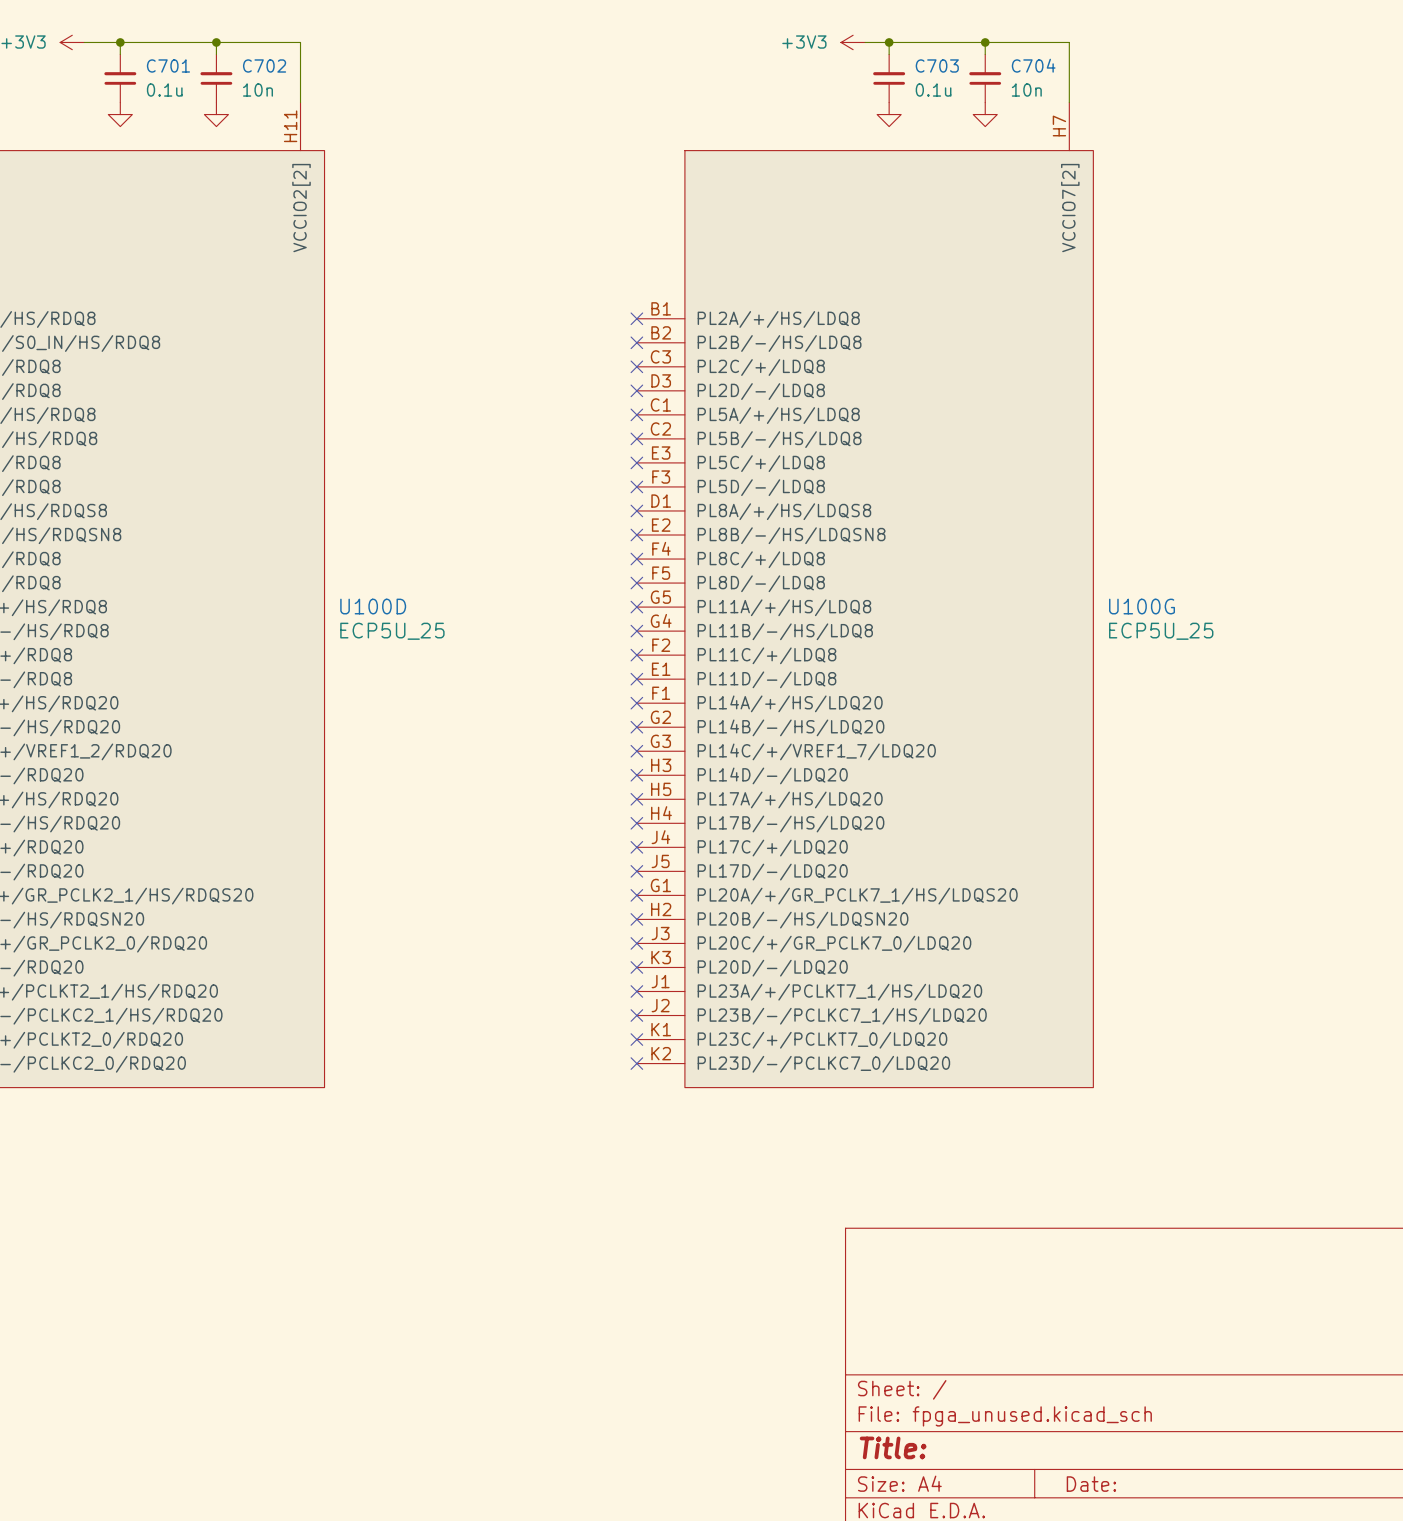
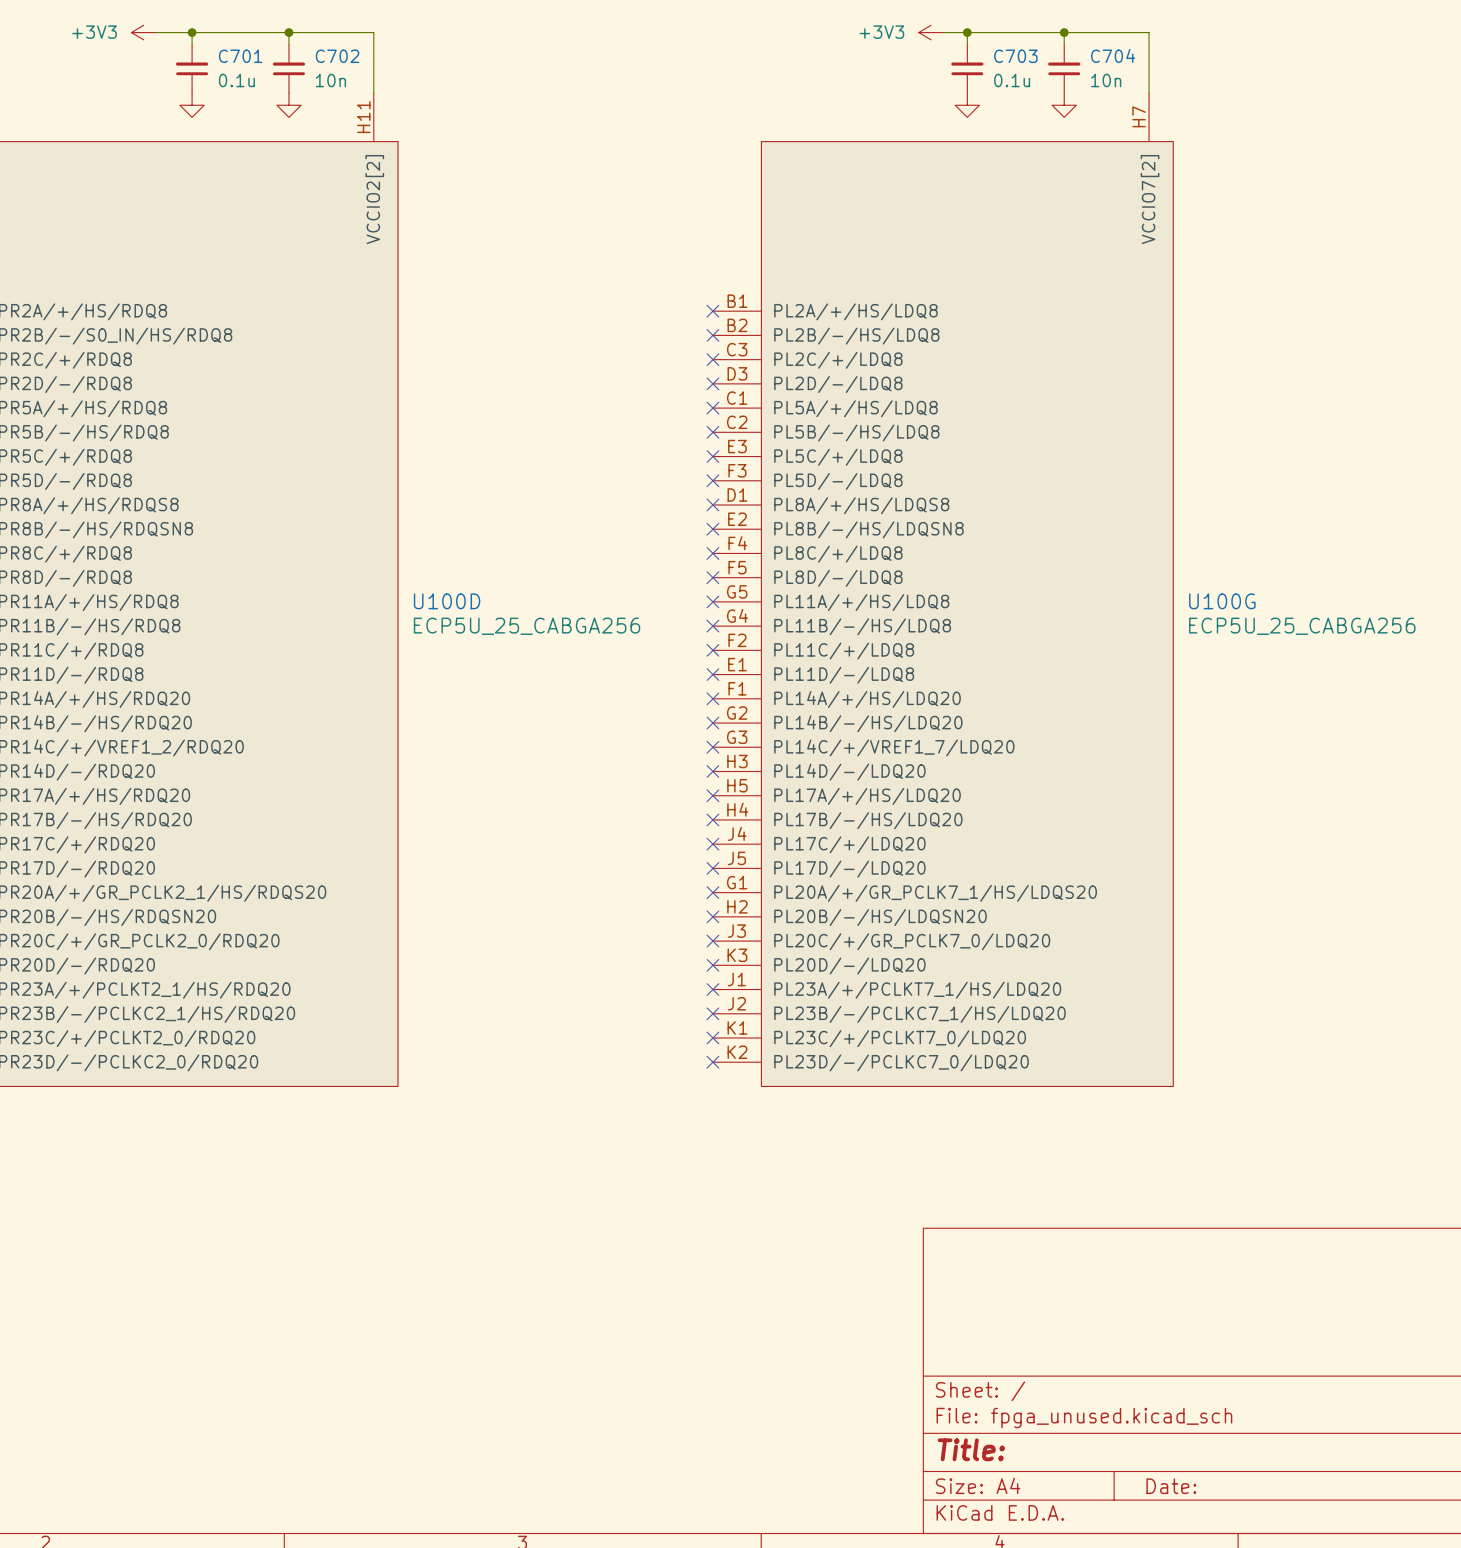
U100D value: ECP5U_25 (392, 631) -> ECP5U_25_CABGA256 (527, 626)
U100G value: ECP5U_25 (1161, 631) -> ECP5U_25_CABGA256 (1302, 626)

